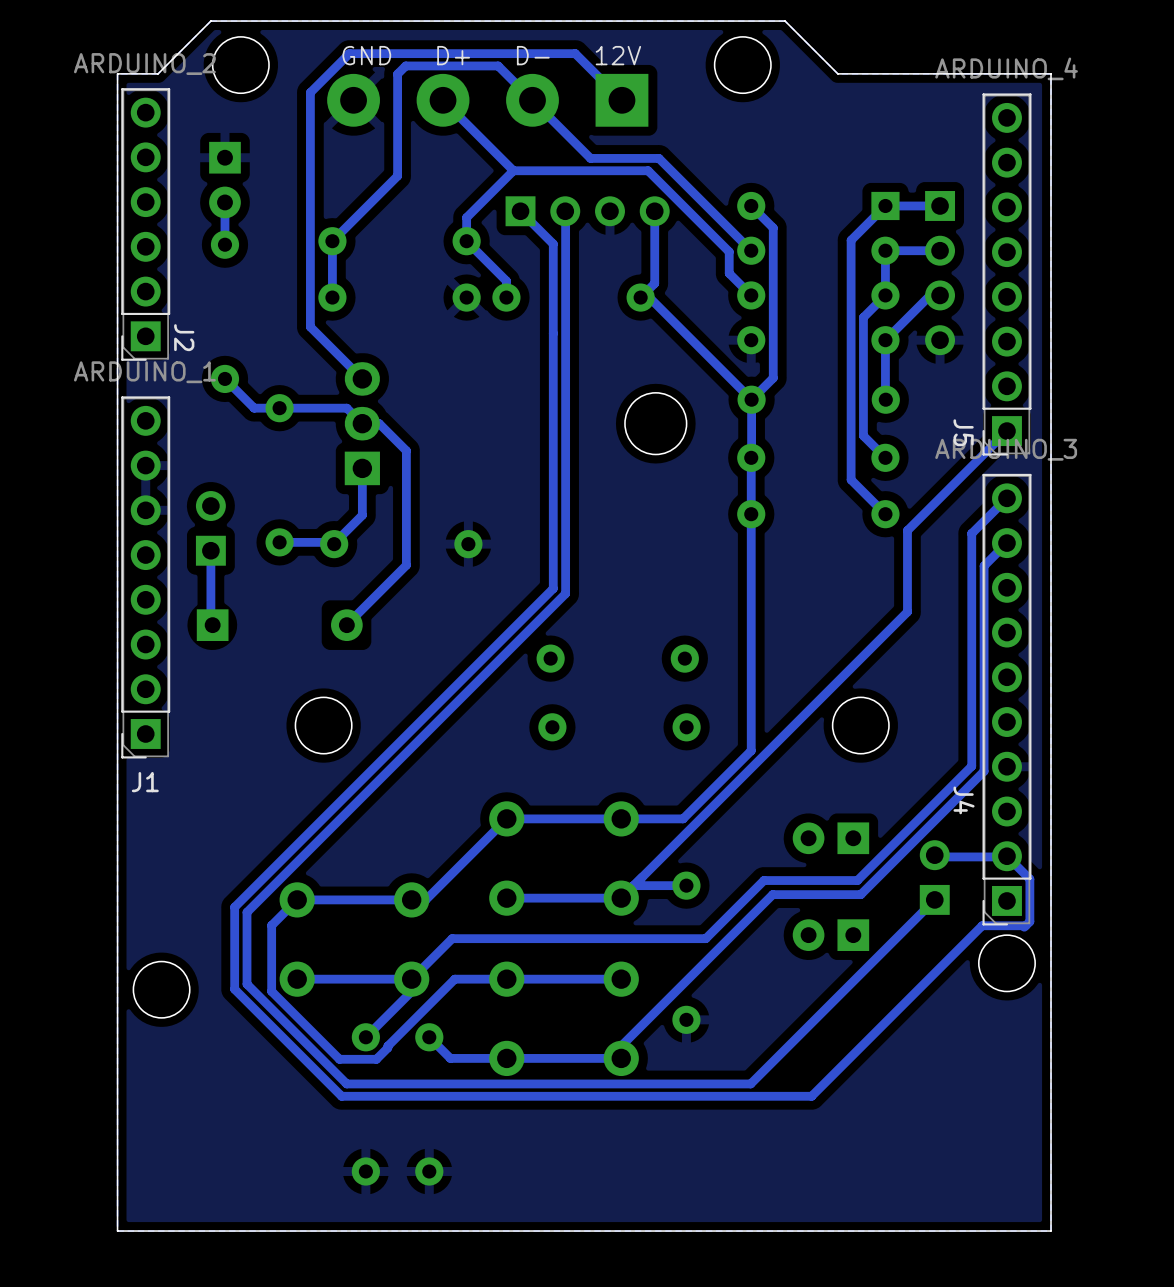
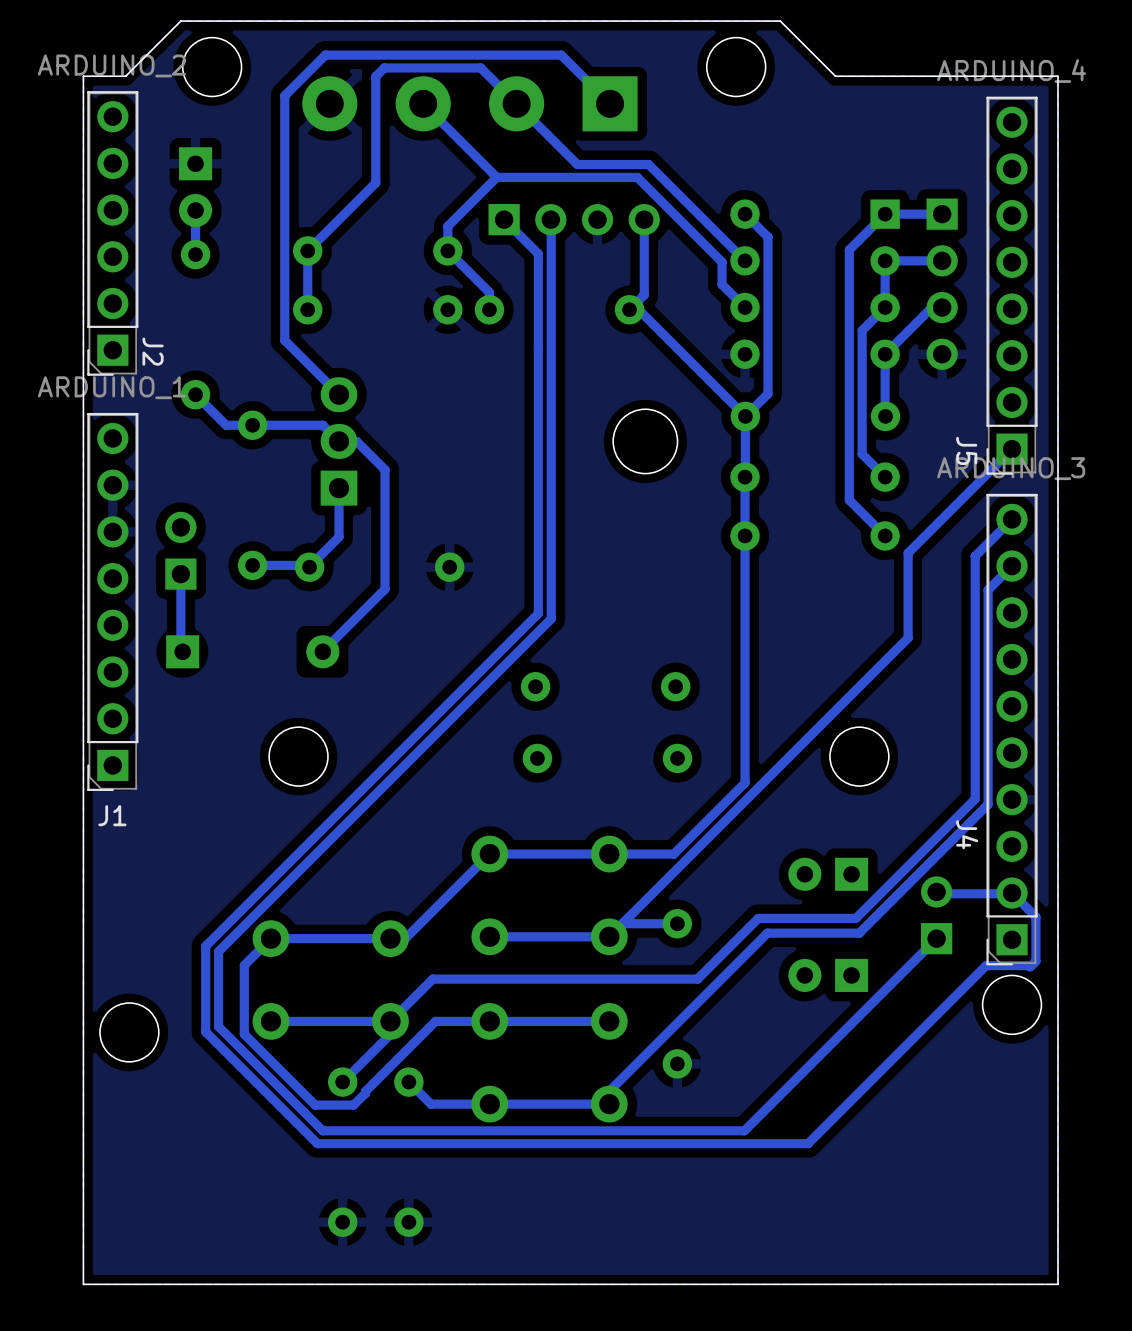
text: GND D+ D- 12V (491, 55) -> none

